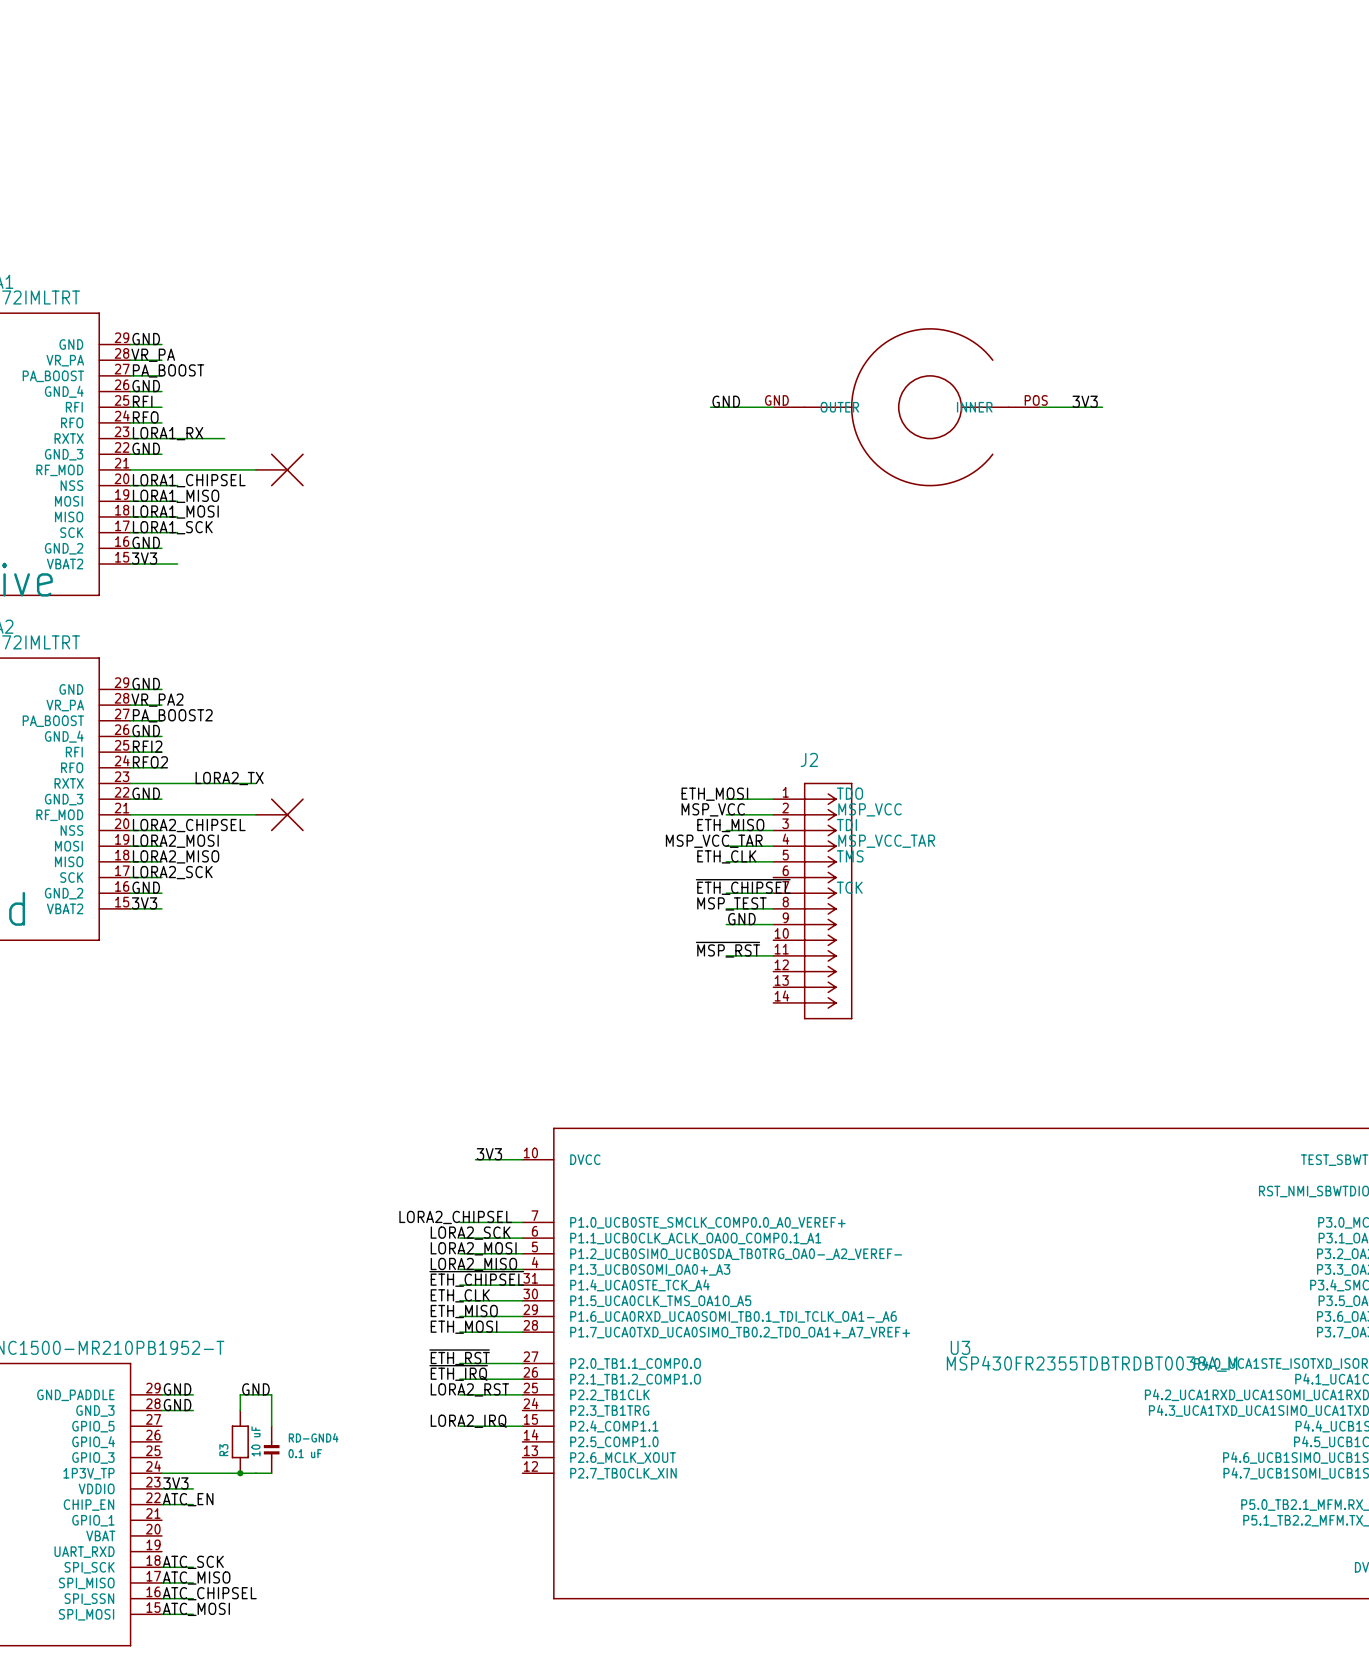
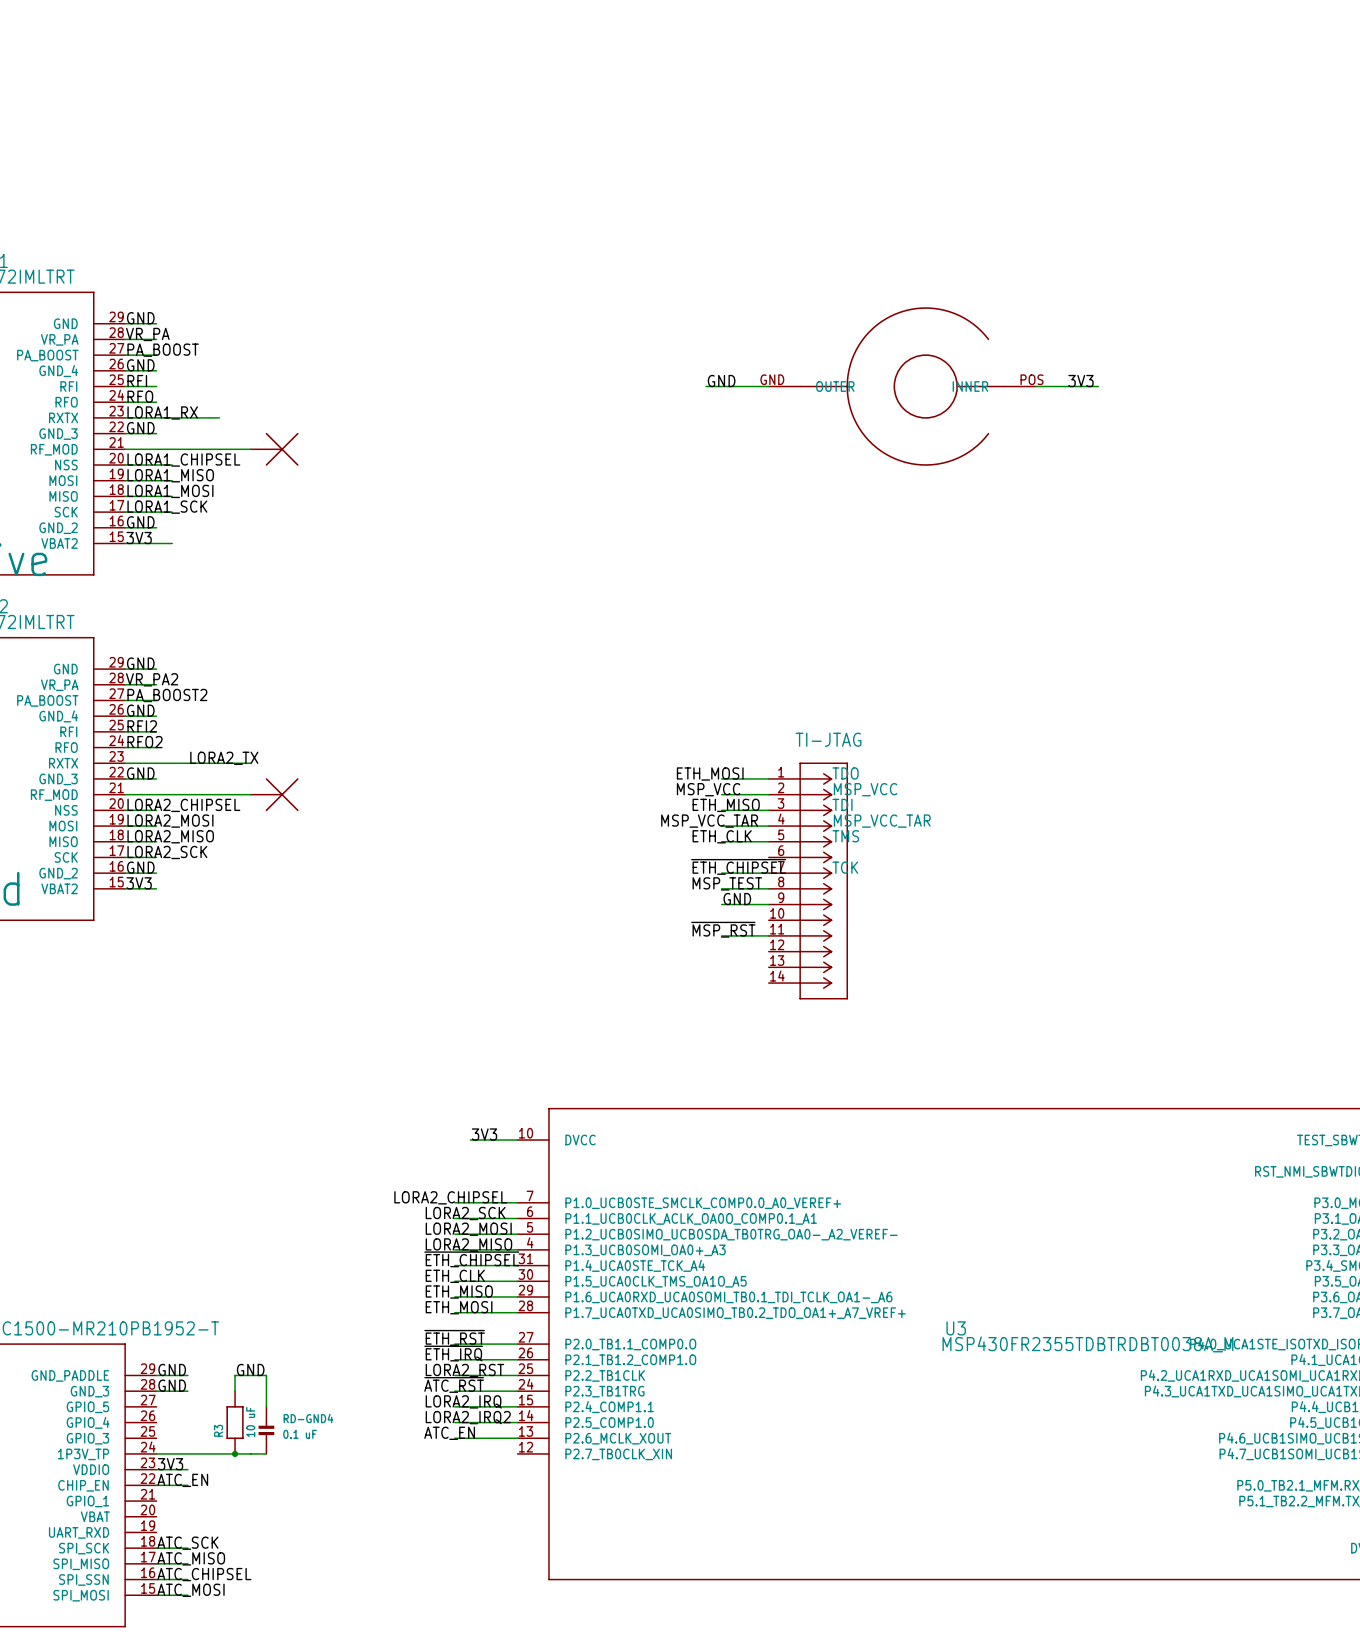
J2 name: J2 (809, 759) -> TI-JTAG (828, 739)
label: none -> ~{ATC_RST} (454, 1384)
wire: none -> (454, 1391) (517, 1391)
label: none -> LORA2_IRQ2 (468, 1417)
wire: none -> (454, 1422) (517, 1422)
label: none -> ATC_EN (449, 1433)
wire: none -> (454, 1438) (517, 1438)

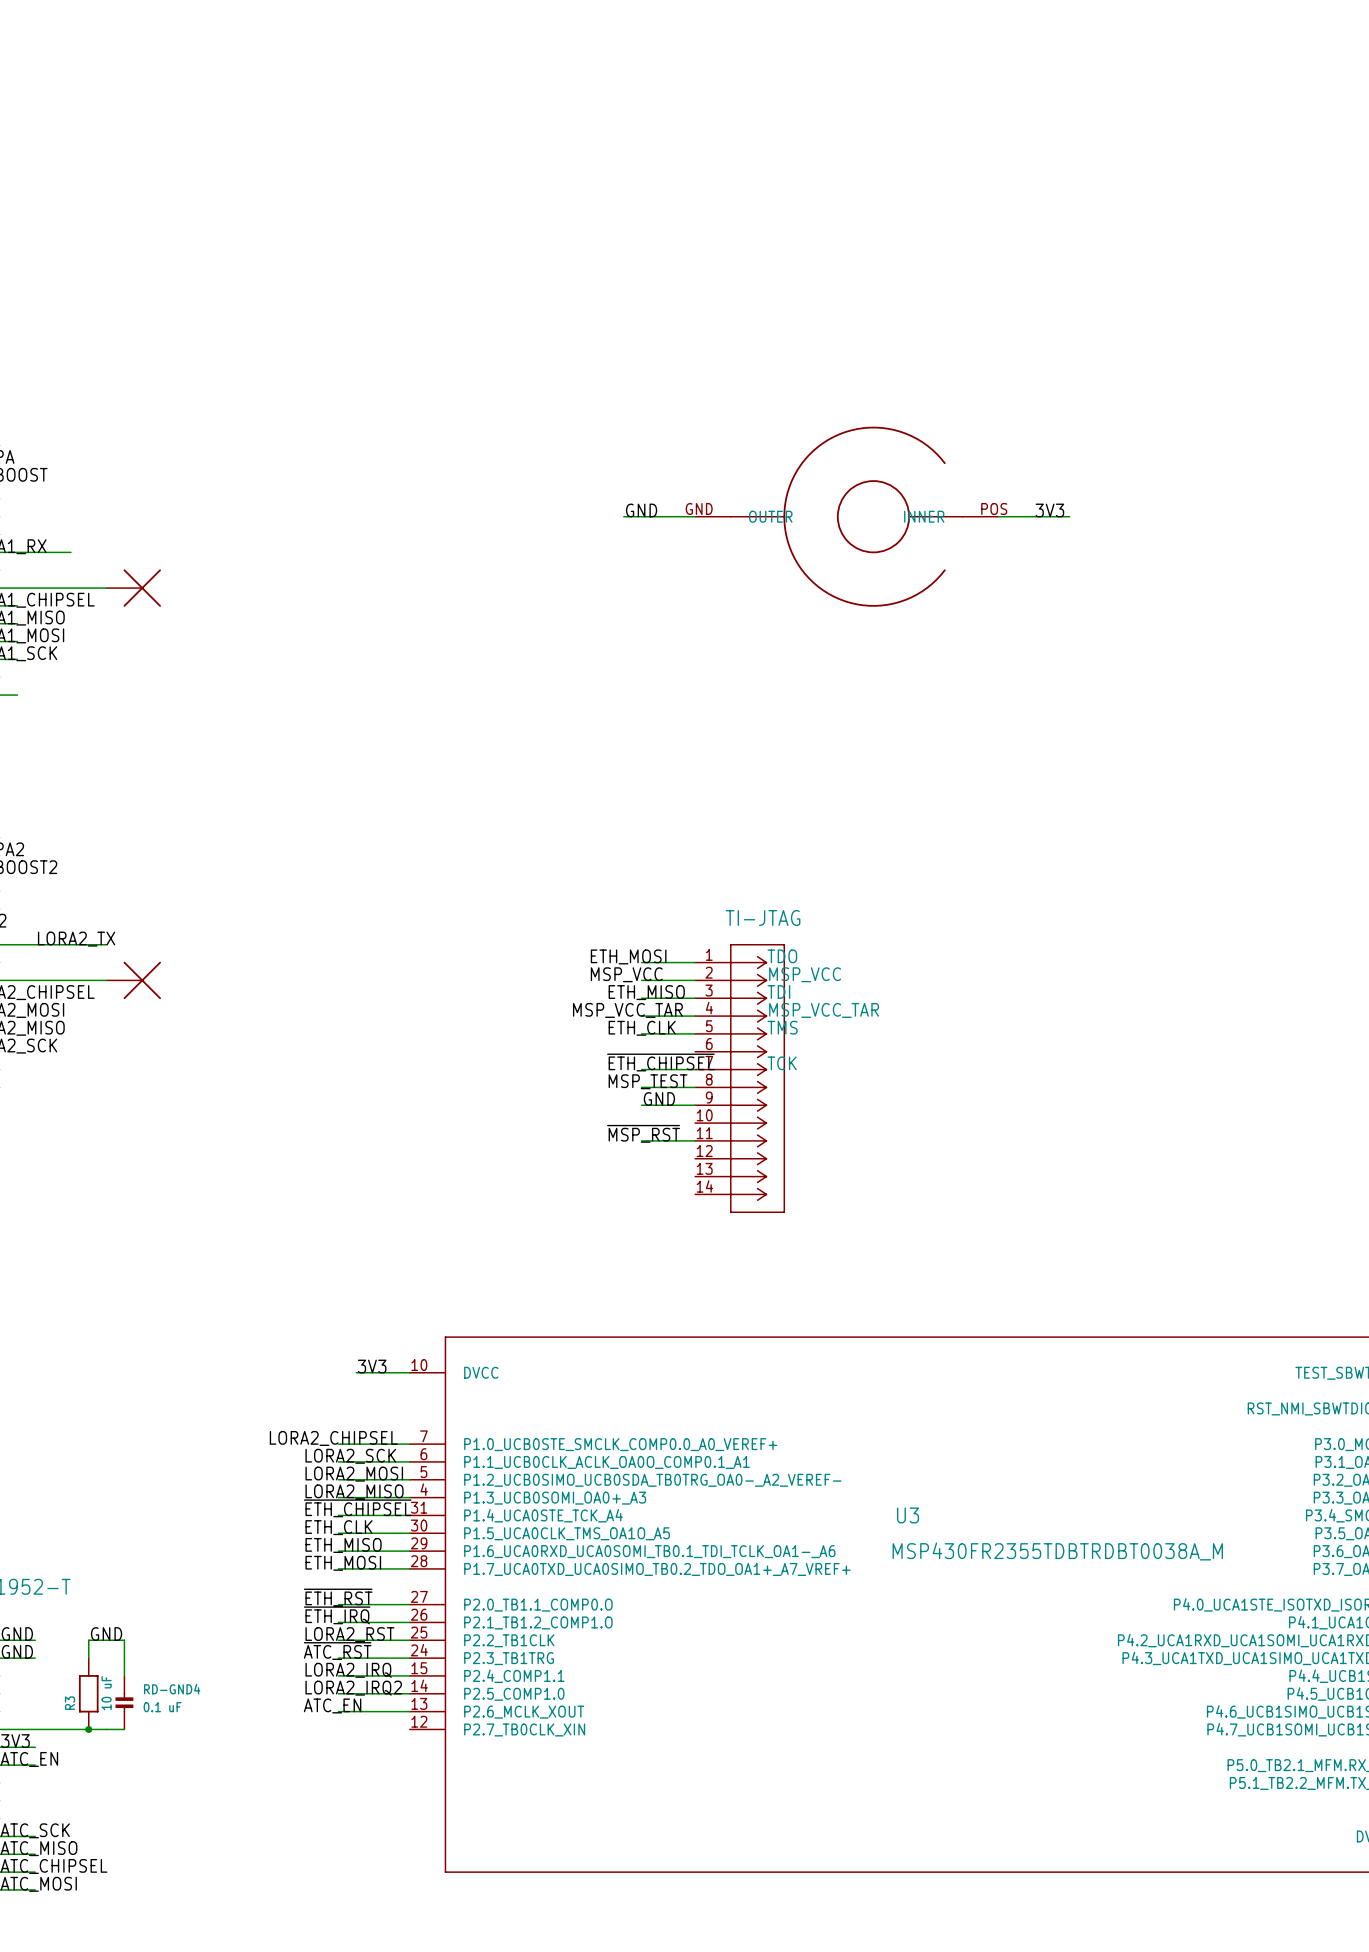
U3 name position: U3 (956, 1328) -> U3 (908, 1515)
U3 value position: MSP430FR2355TDBTRDBT0038A_M (1087, 1344) -> MSP430FR2355TDBTRDBT0038A_M (1057, 1551)

